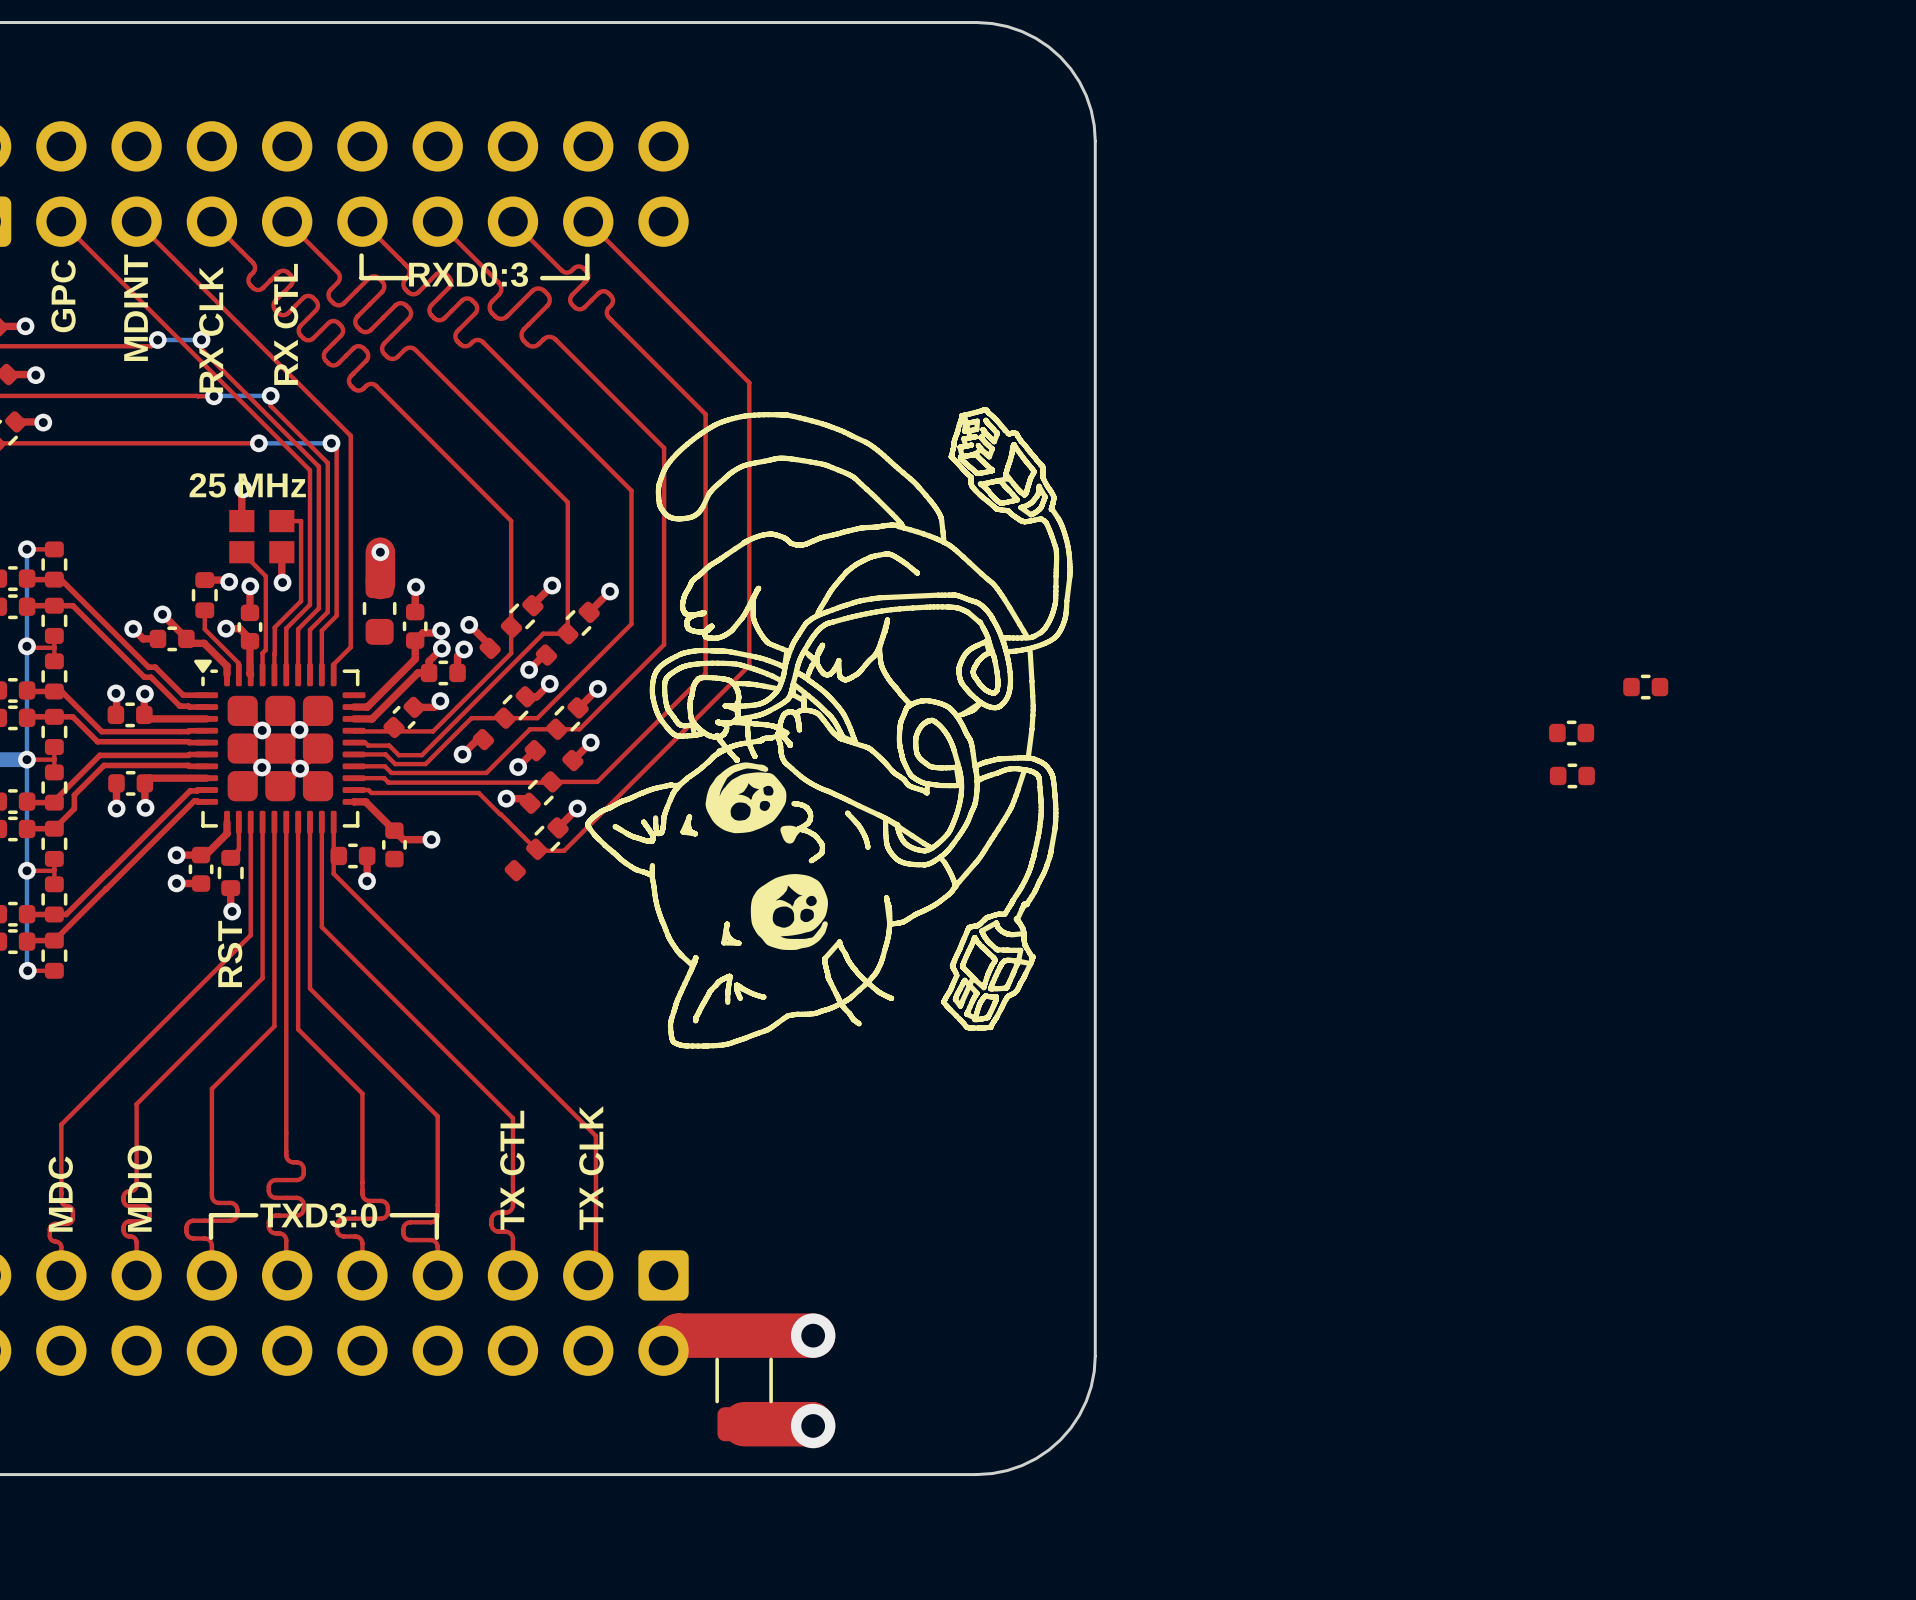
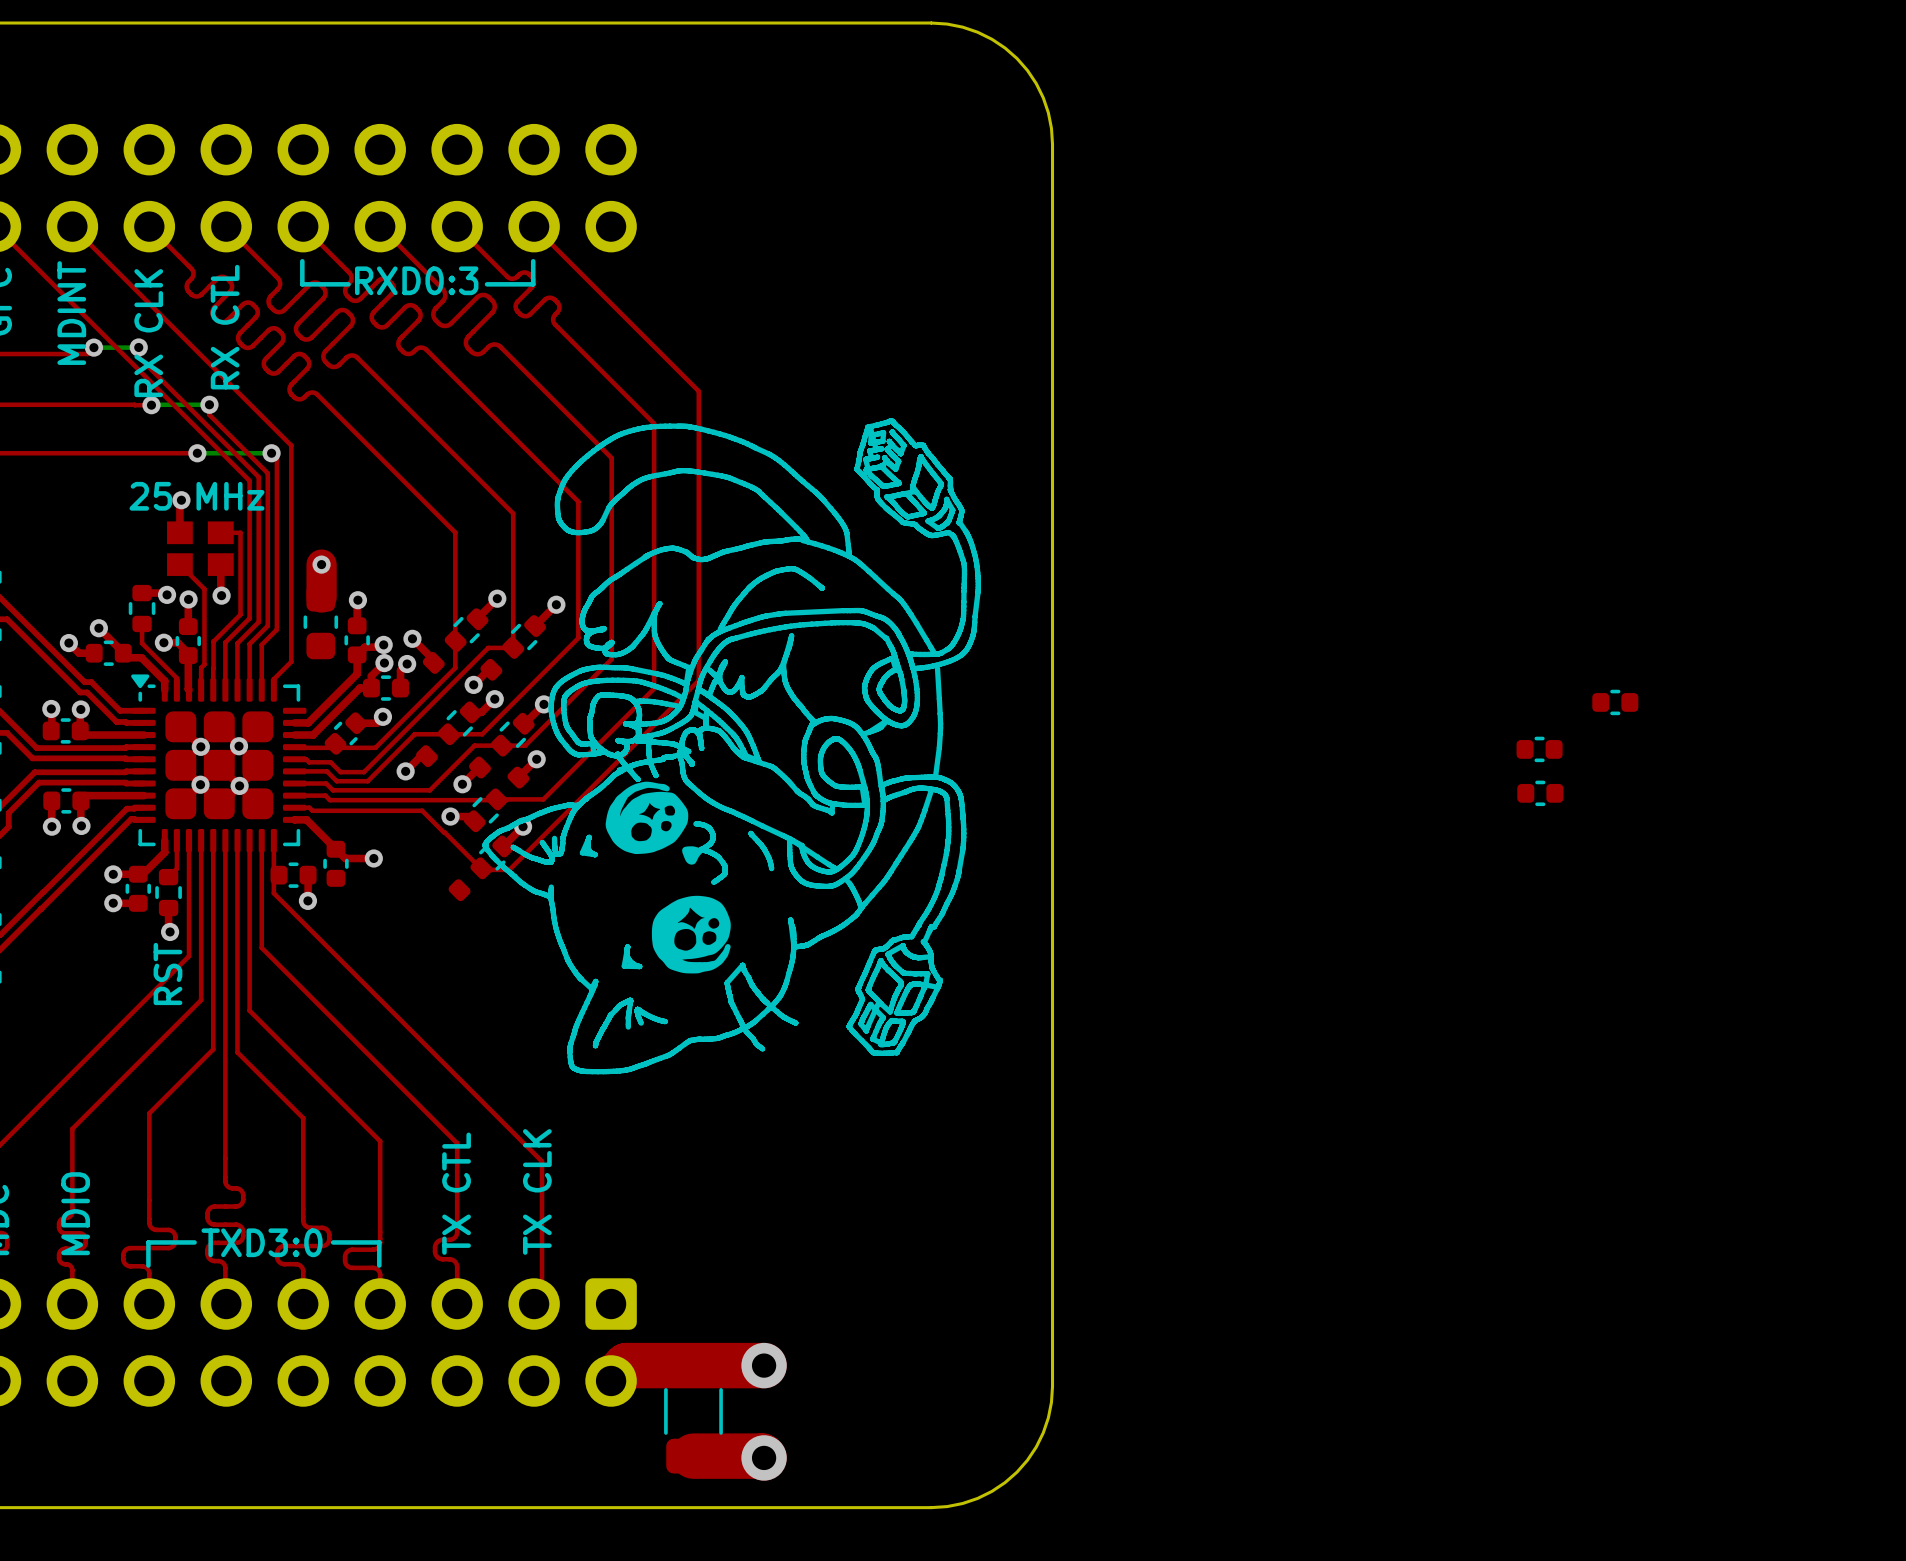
drawing position: (828, 727) -> (731, 746)

